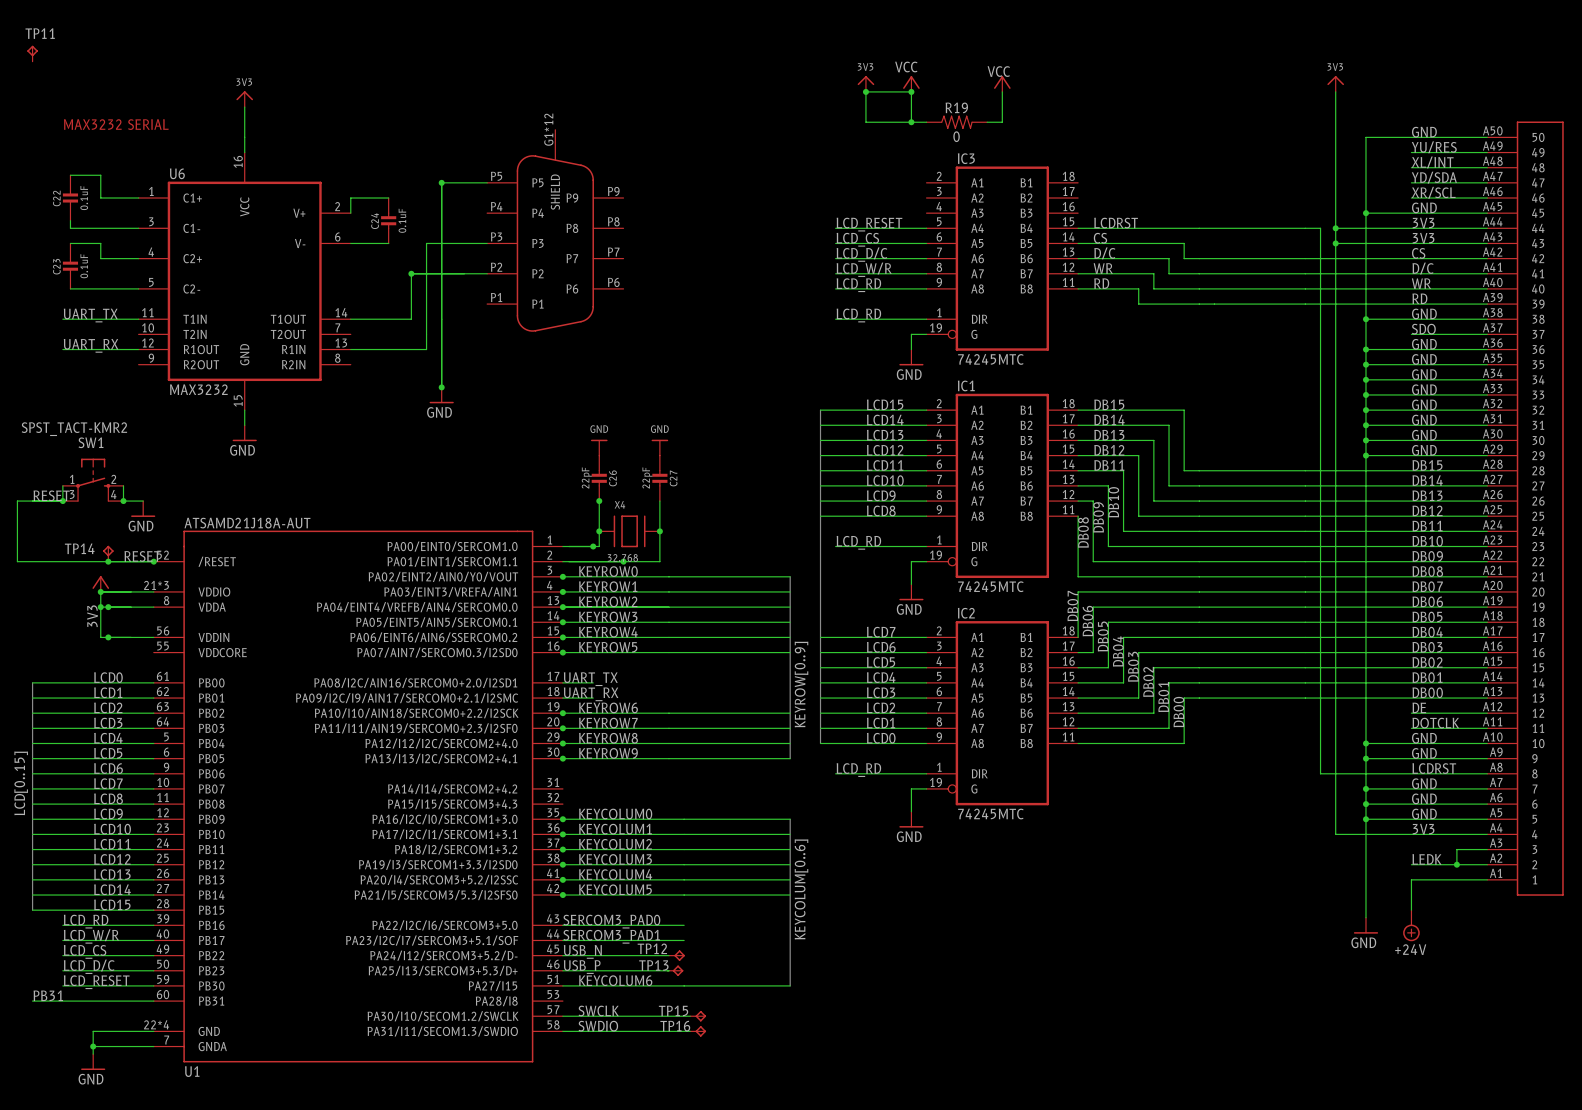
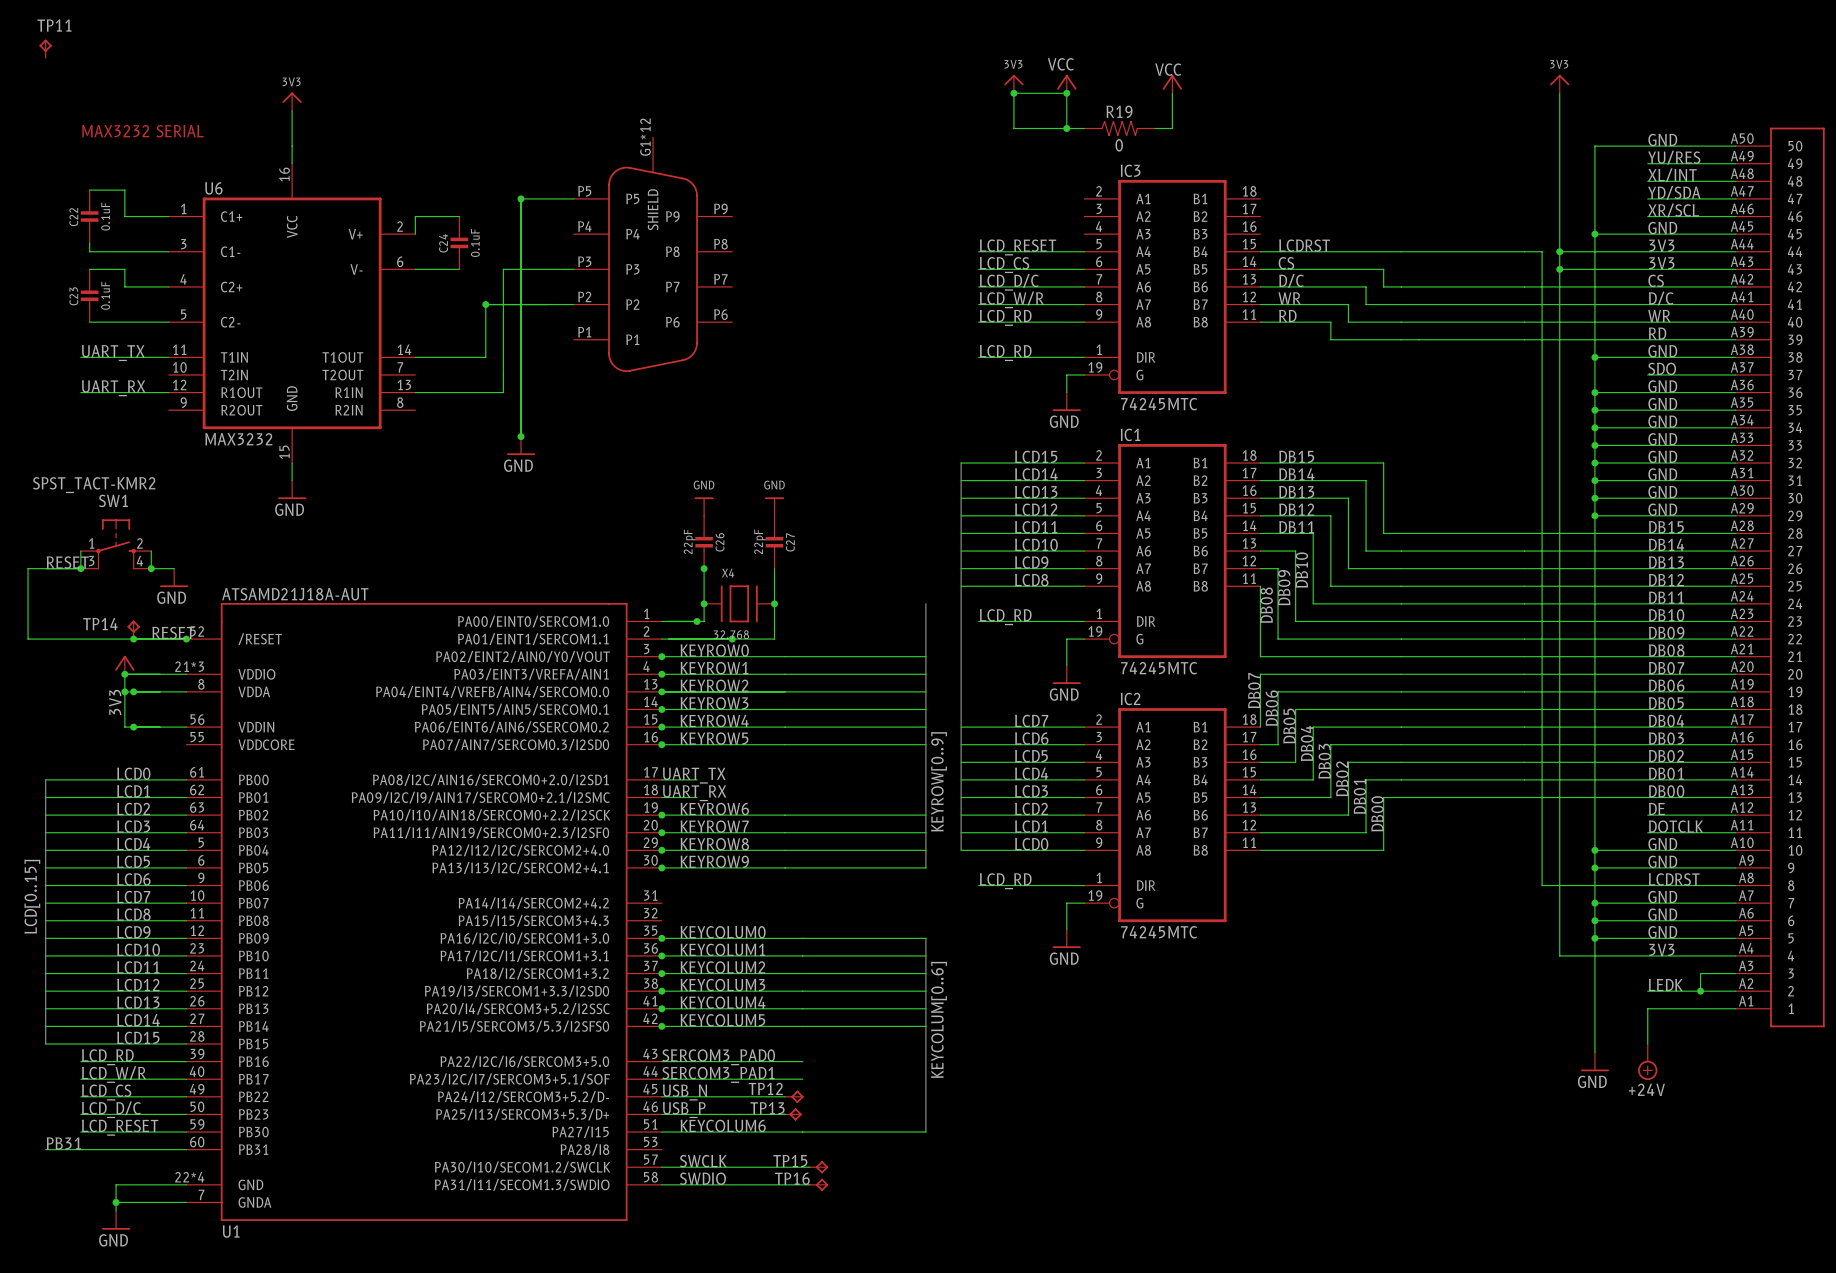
bus: none -> (925, 603) (925, 656)

